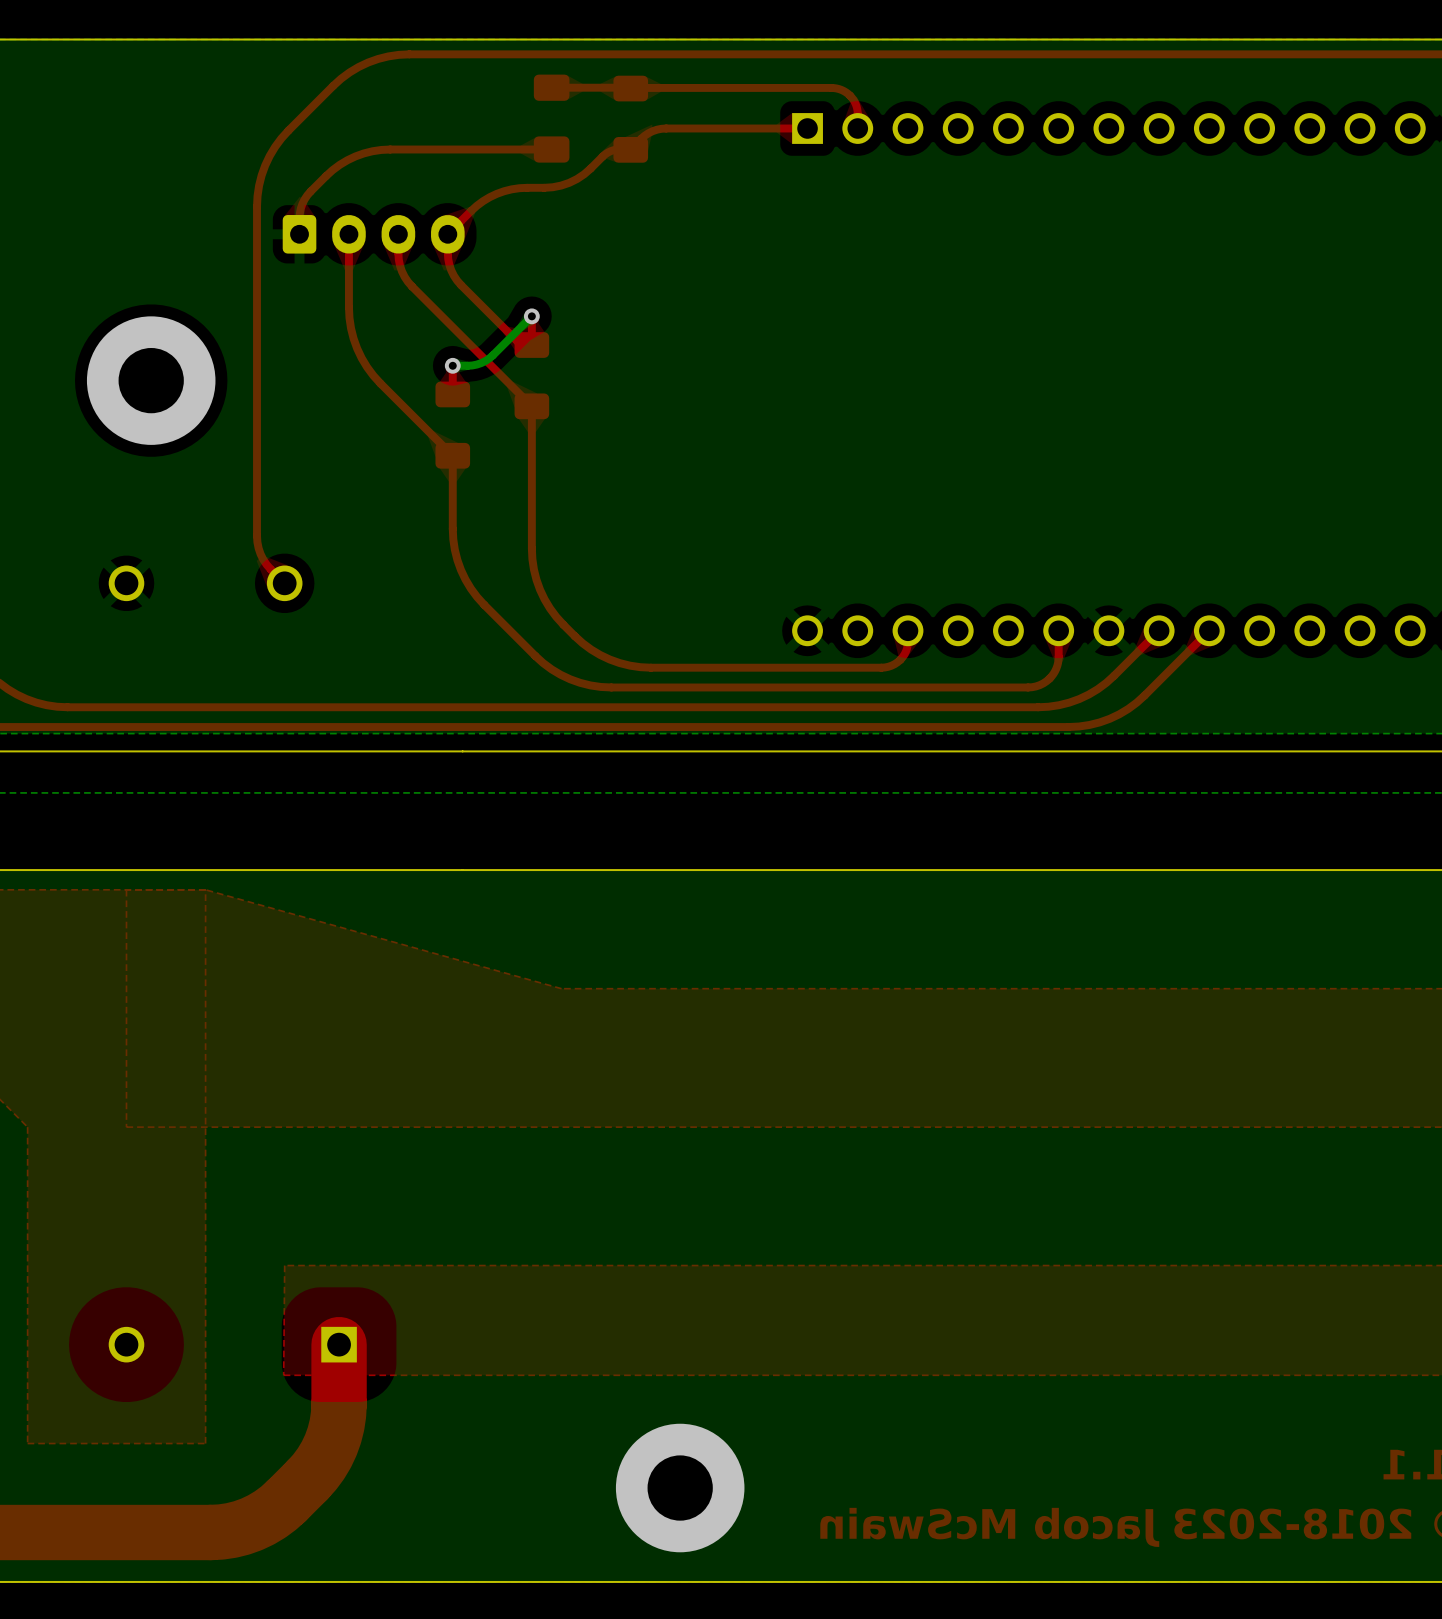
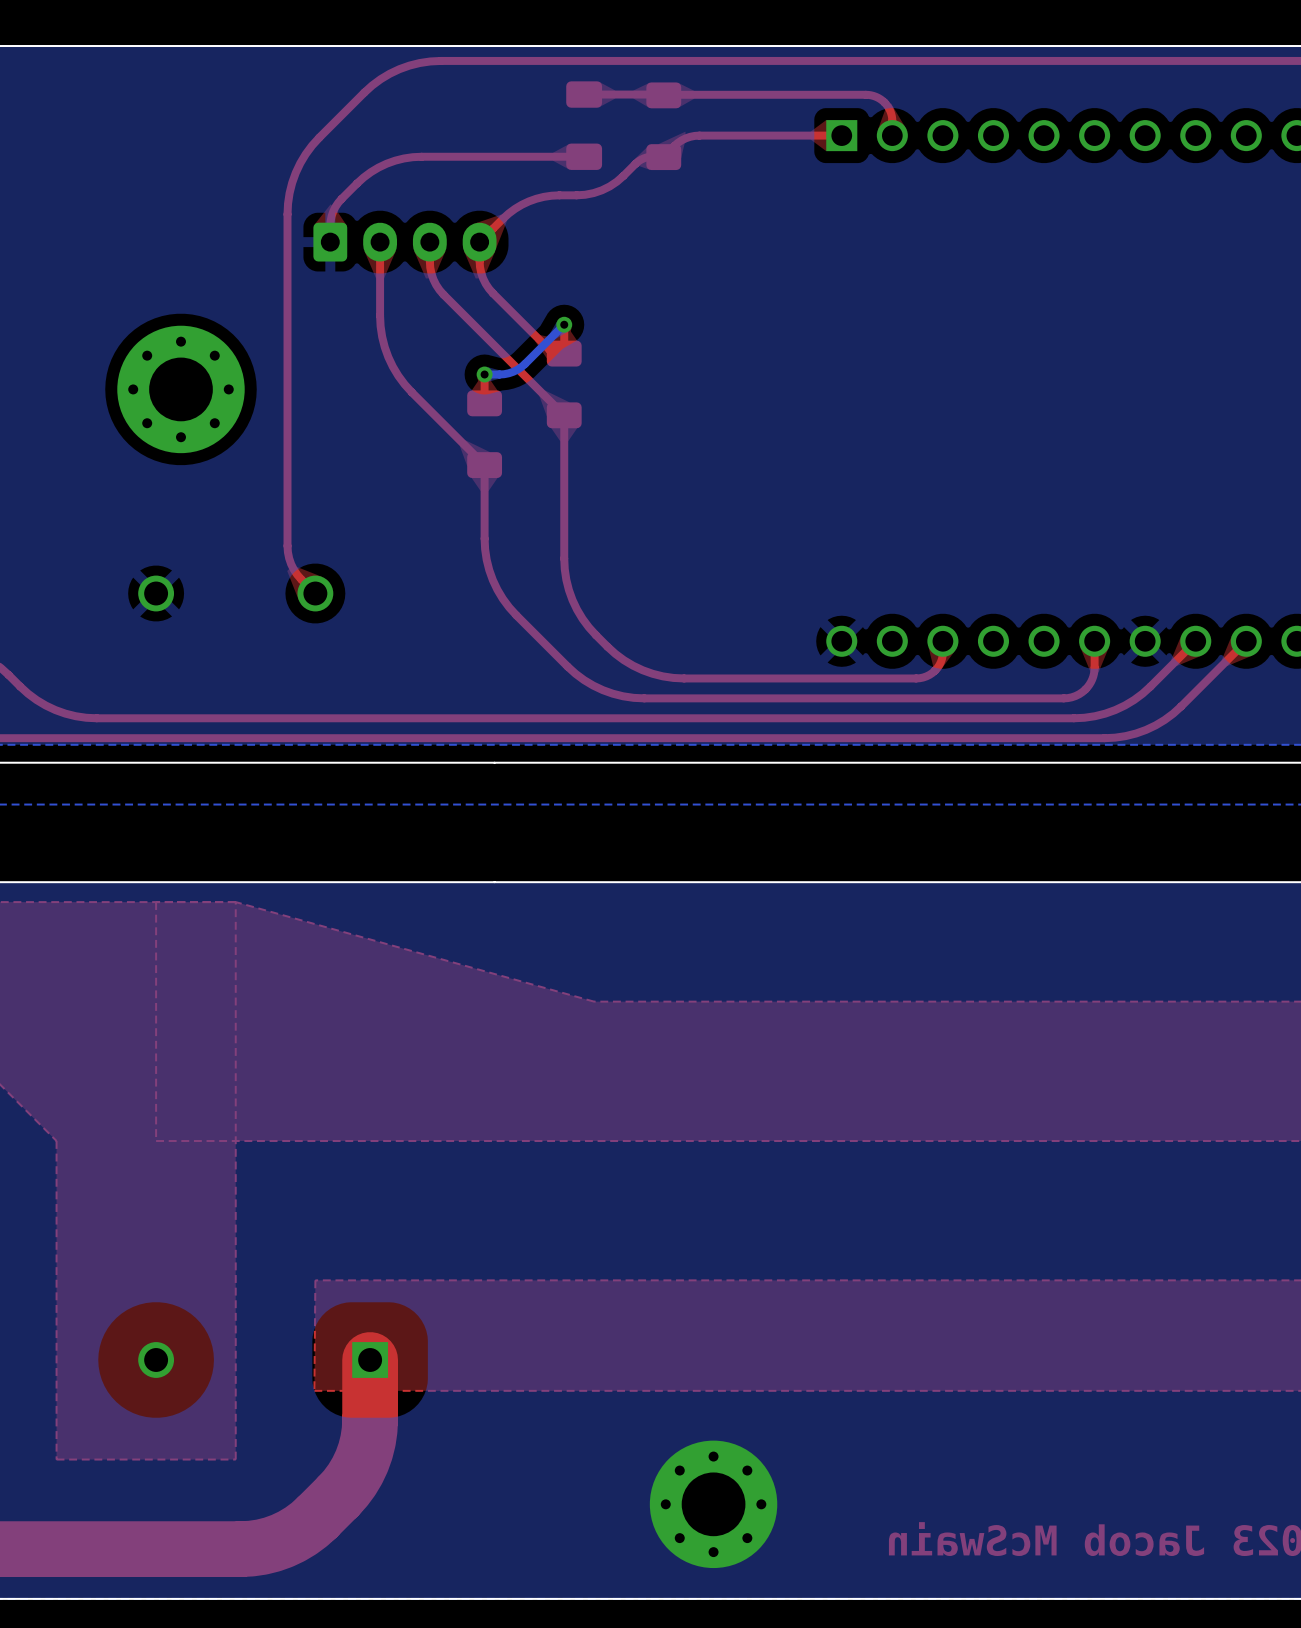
via: (151, 380) -> none
part: none -> (180, 389)
via: (680, 1488) -> none
part: none -> (713, 1504)

